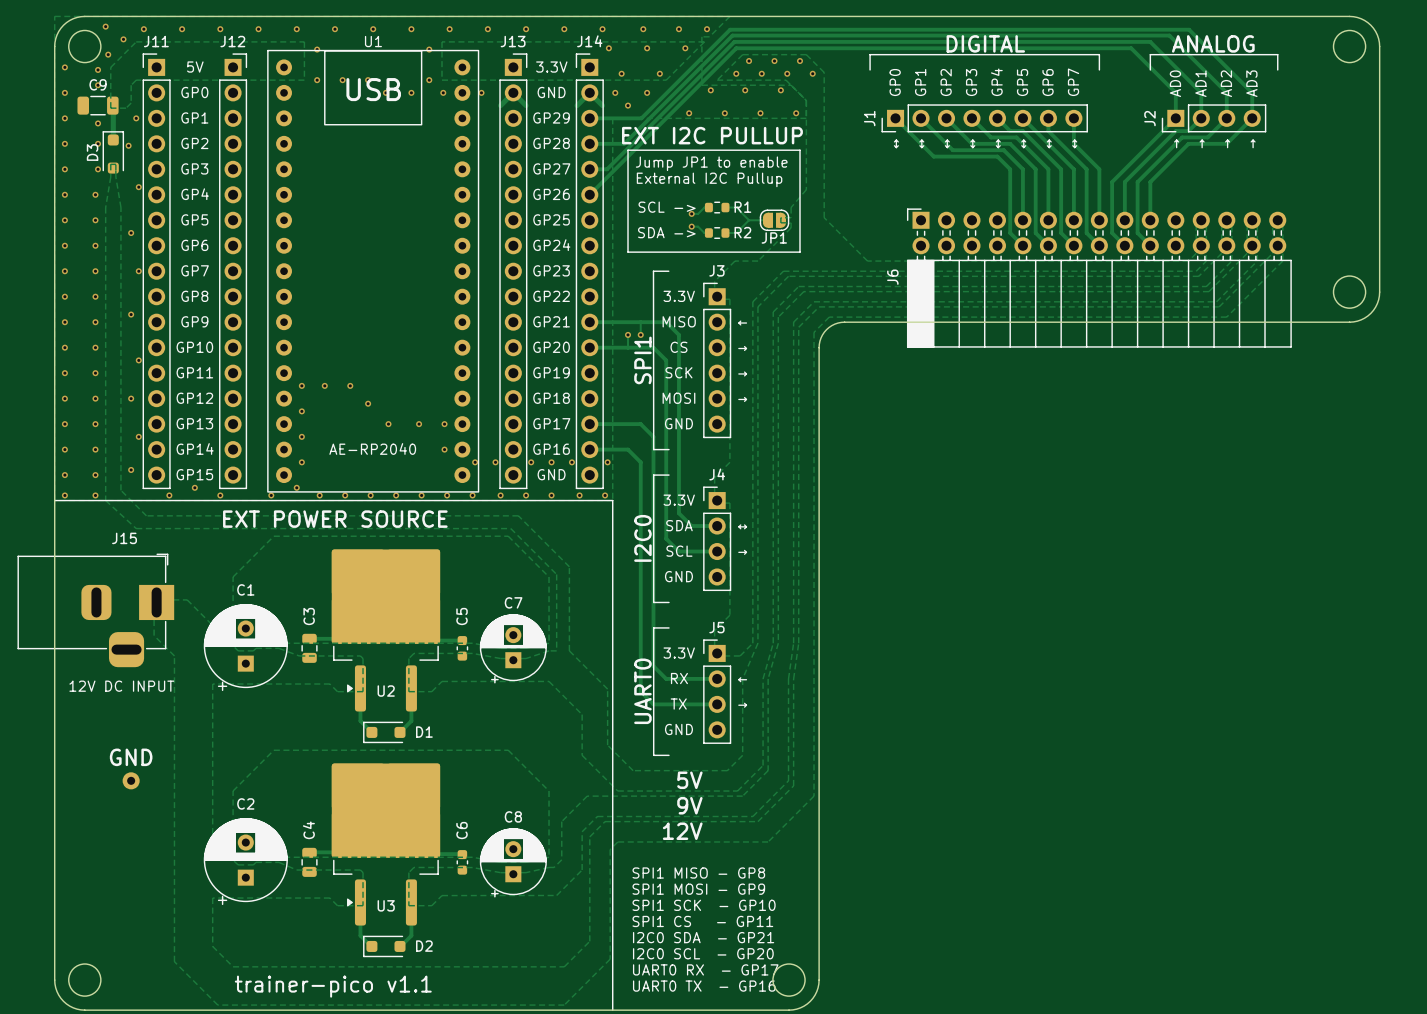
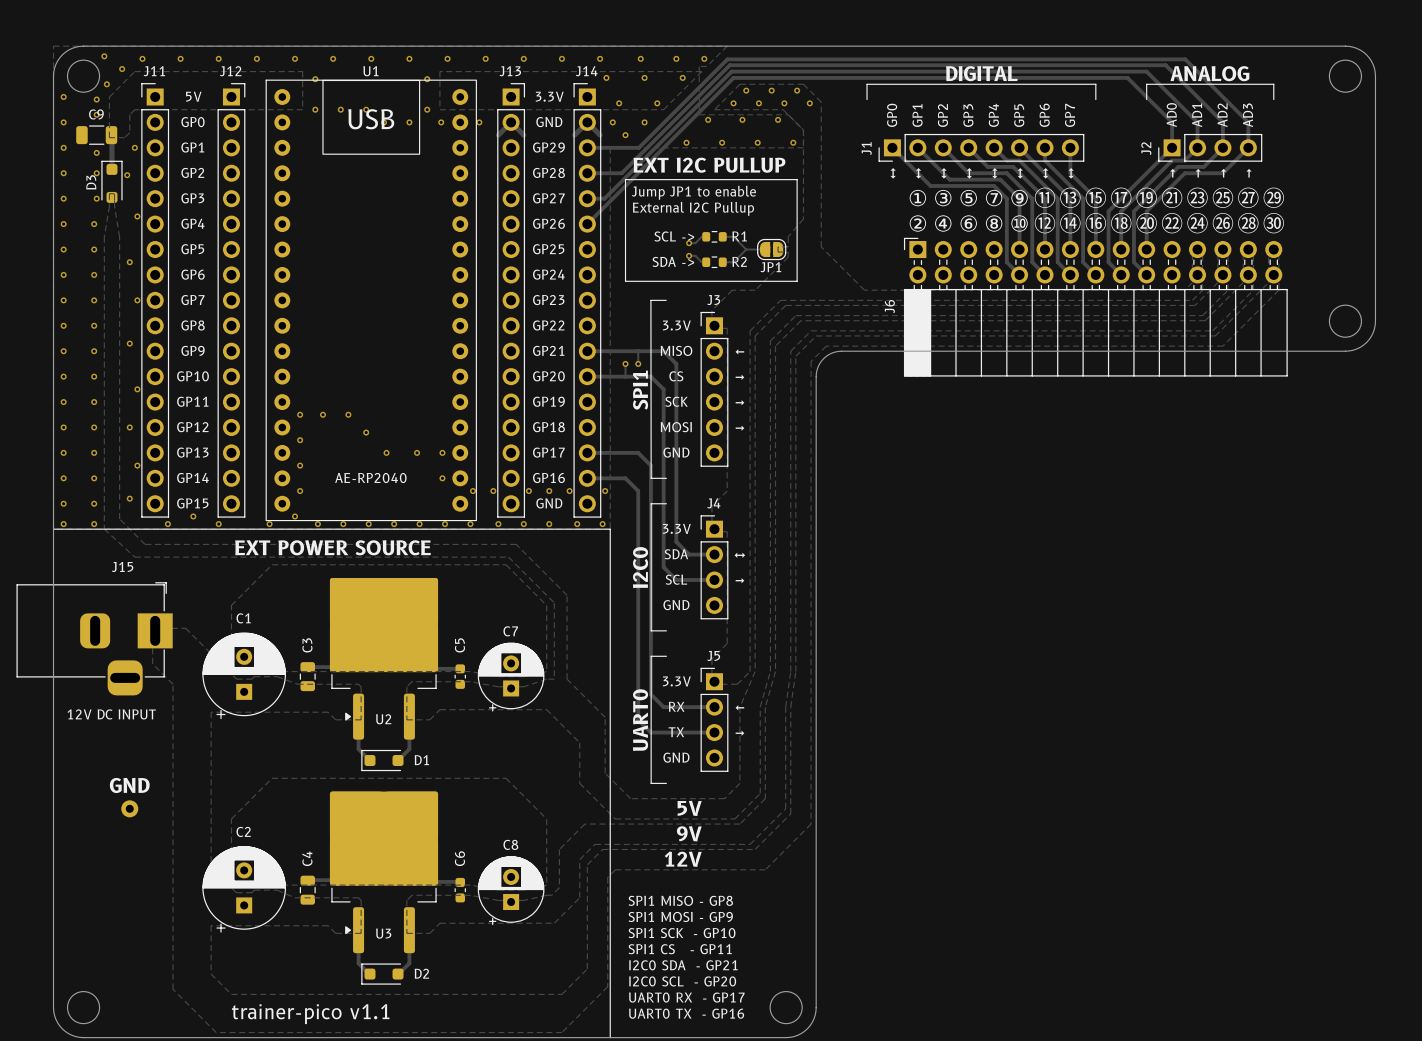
text: none -> ① (917, 198)
text: none -> ③ (943, 198)
text: none -> ⑤ (968, 198)
text: none -> ⑦ (994, 198)
text: none -> ⑨ (1019, 198)
text: none -> ⑪ (1044, 197)
text: none -> ⑬ (1070, 197)
text: none -> ⑮ (1095, 197)
text: none -> ⑰ (1121, 197)
text: none -> ⑲ (1146, 197)
text: none -> ㉑ (1172, 197)
text: none -> ㉓ (1197, 197)
text: none -> ㉕ (1222, 197)
text: none -> ㉗ (1248, 197)
text: none -> ㉙ (1273, 197)
text: none -> ⑫ (1044, 223)
text: none -> ⑭ (1070, 223)
text: none -> ⑯ (1095, 223)
text: none -> ⑱ (1121, 223)
text: none -> ⑳ (1146, 223)
text: none -> ㉒ (1172, 223)
text: none -> ㉔ (1197, 223)
text: none -> ㉖ (1222, 223)
text: none -> ㉘ (1248, 223)
text: none -> ㉚ (1273, 223)
text: none -> ② (917, 223)
text: none -> ④ (943, 223)
text: none -> ⑥ (968, 223)
text: none -> ⑧ (994, 223)
text: none -> ⑩ (1019, 223)

